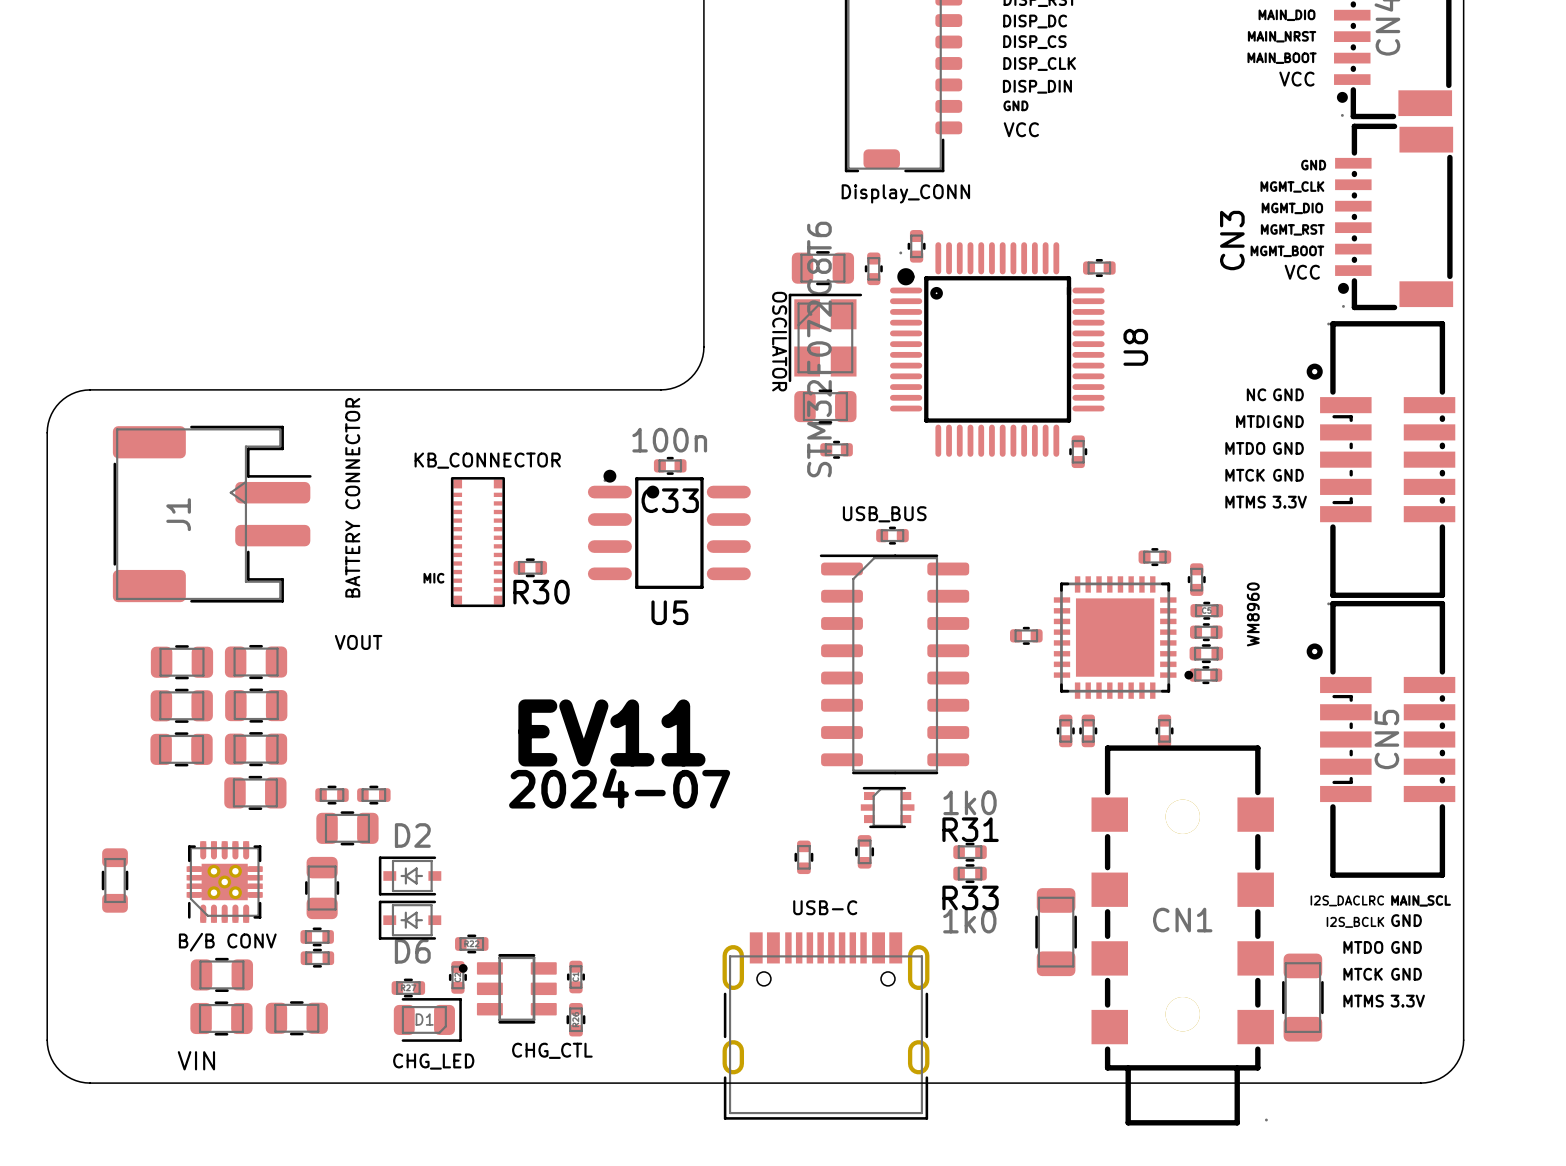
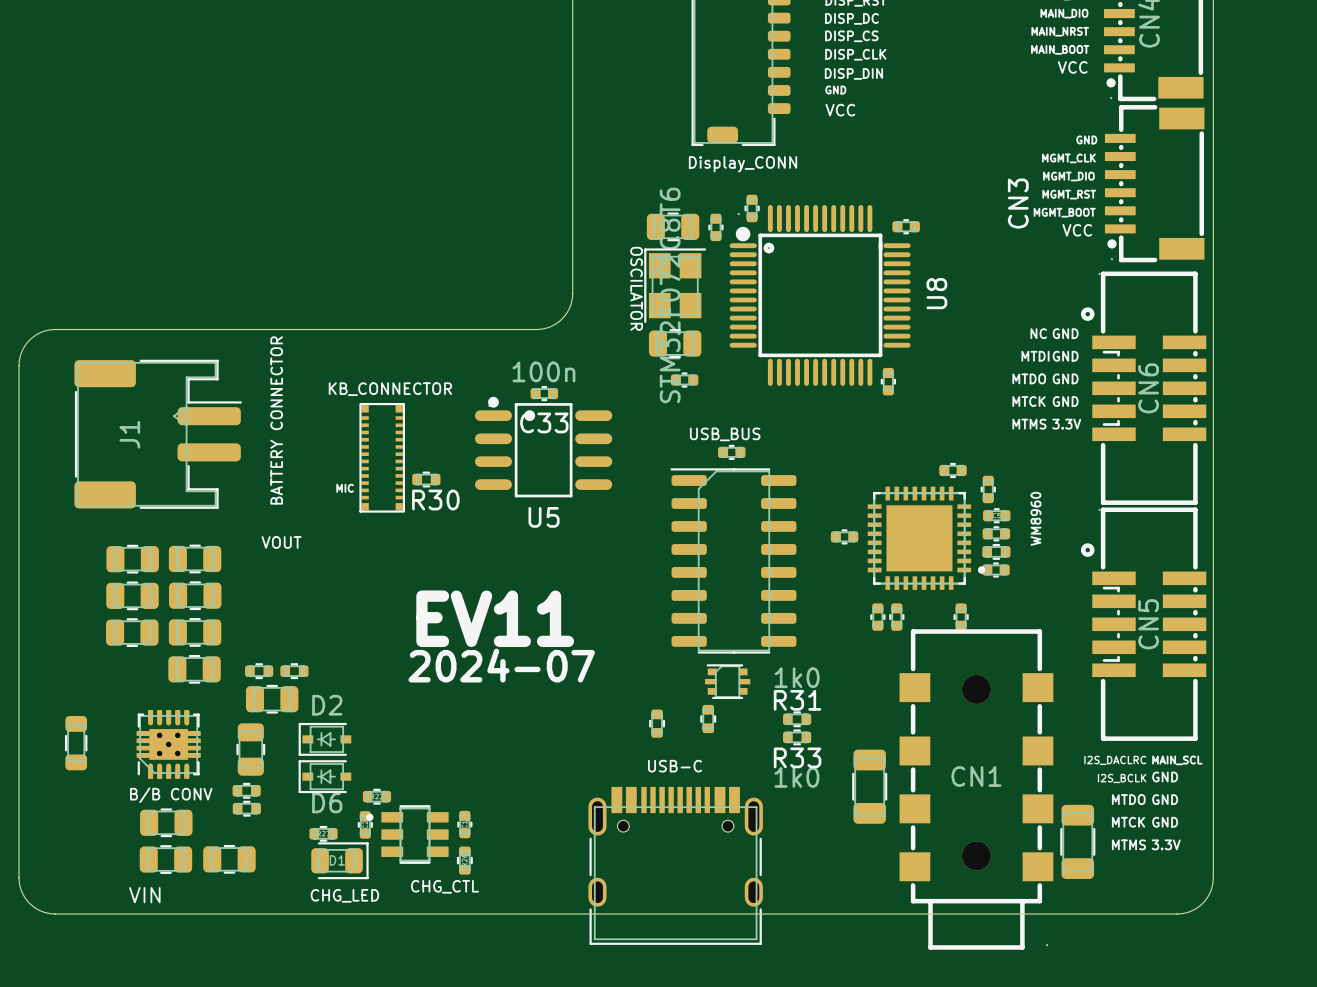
CN6 name: none -> CN6 (1148, 388)

